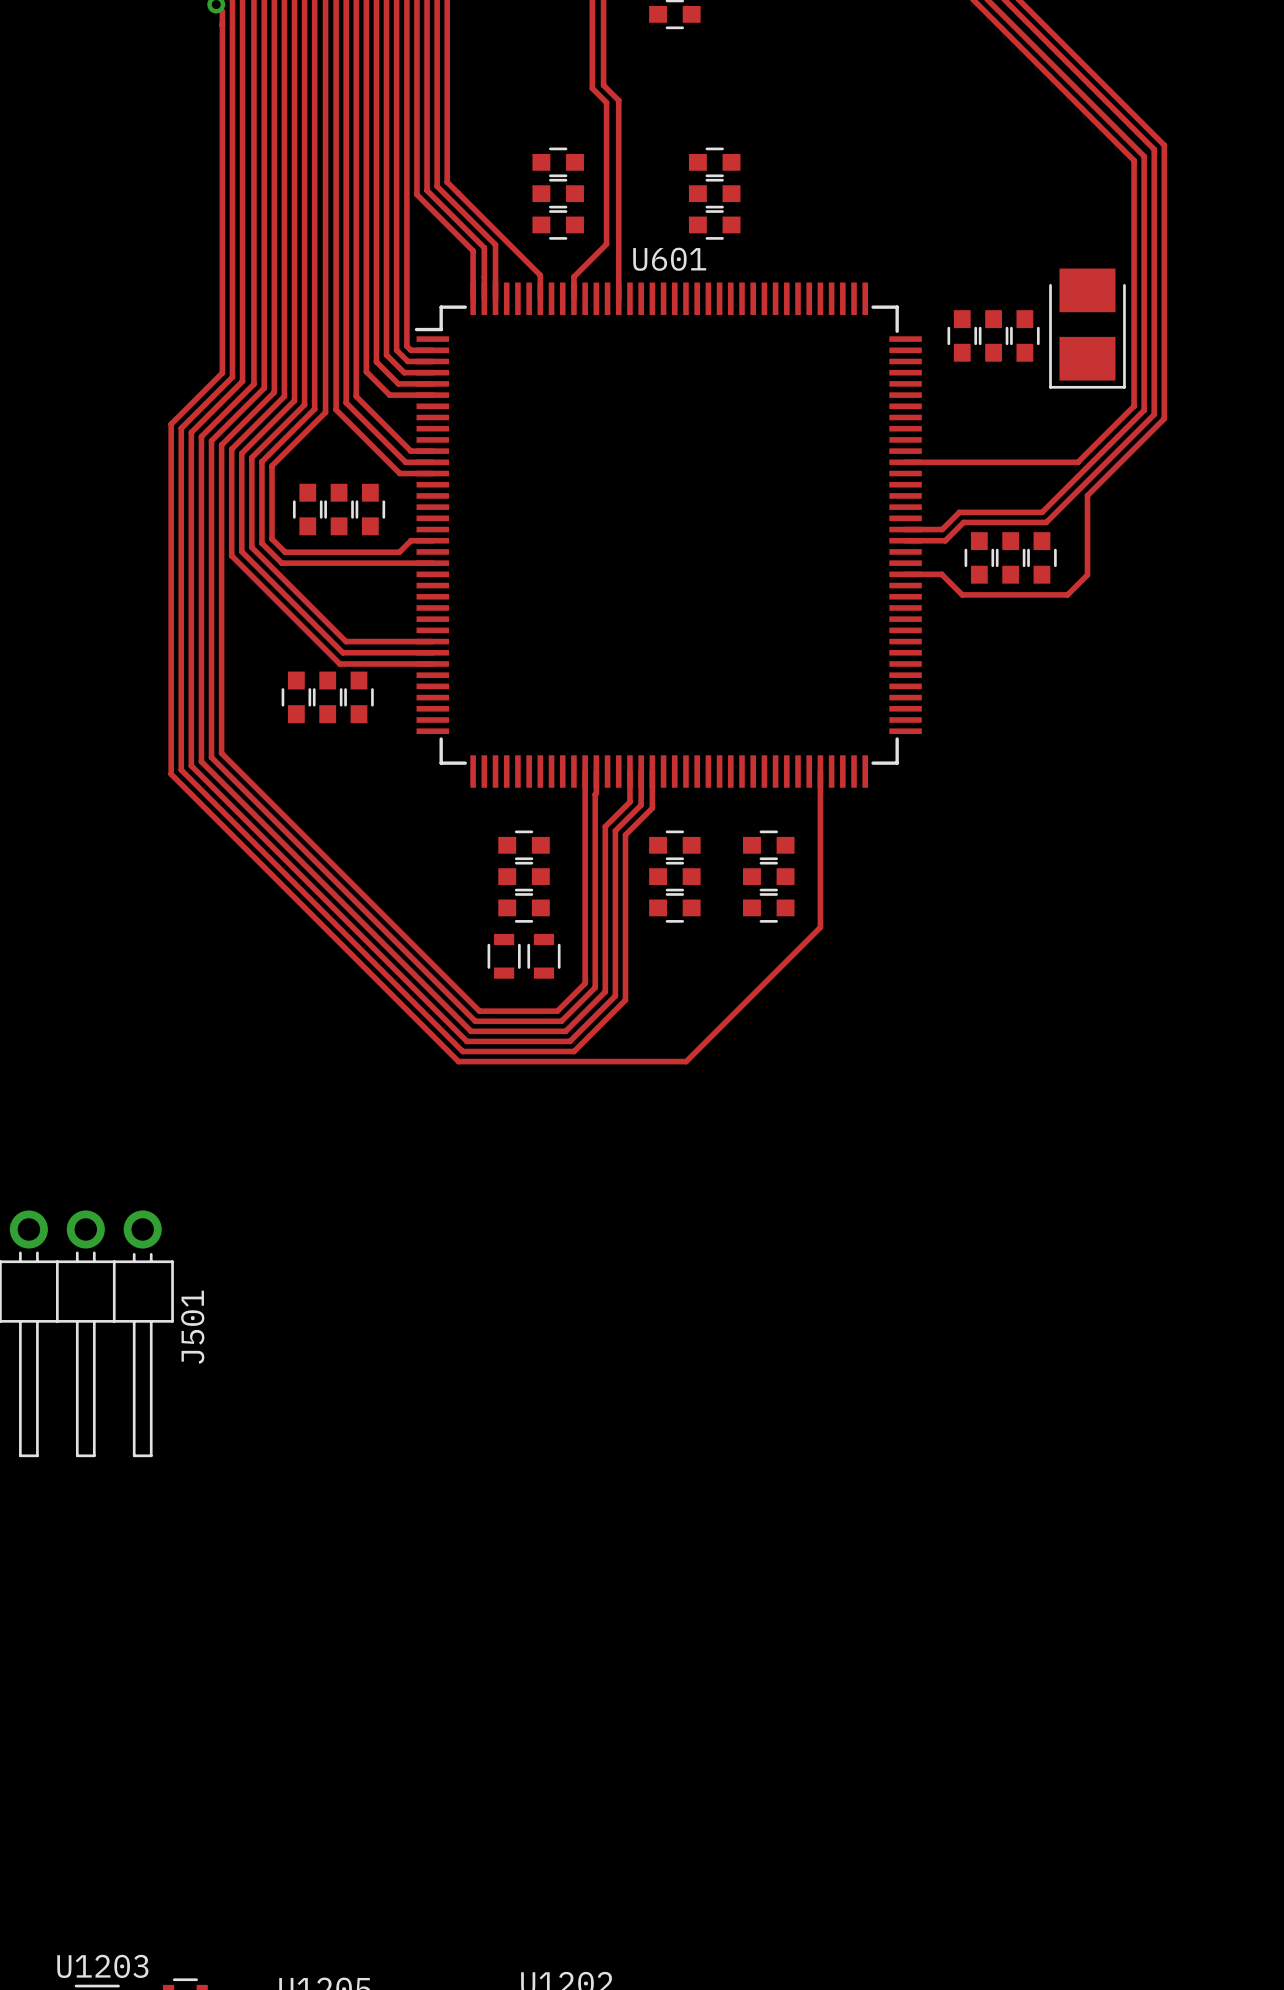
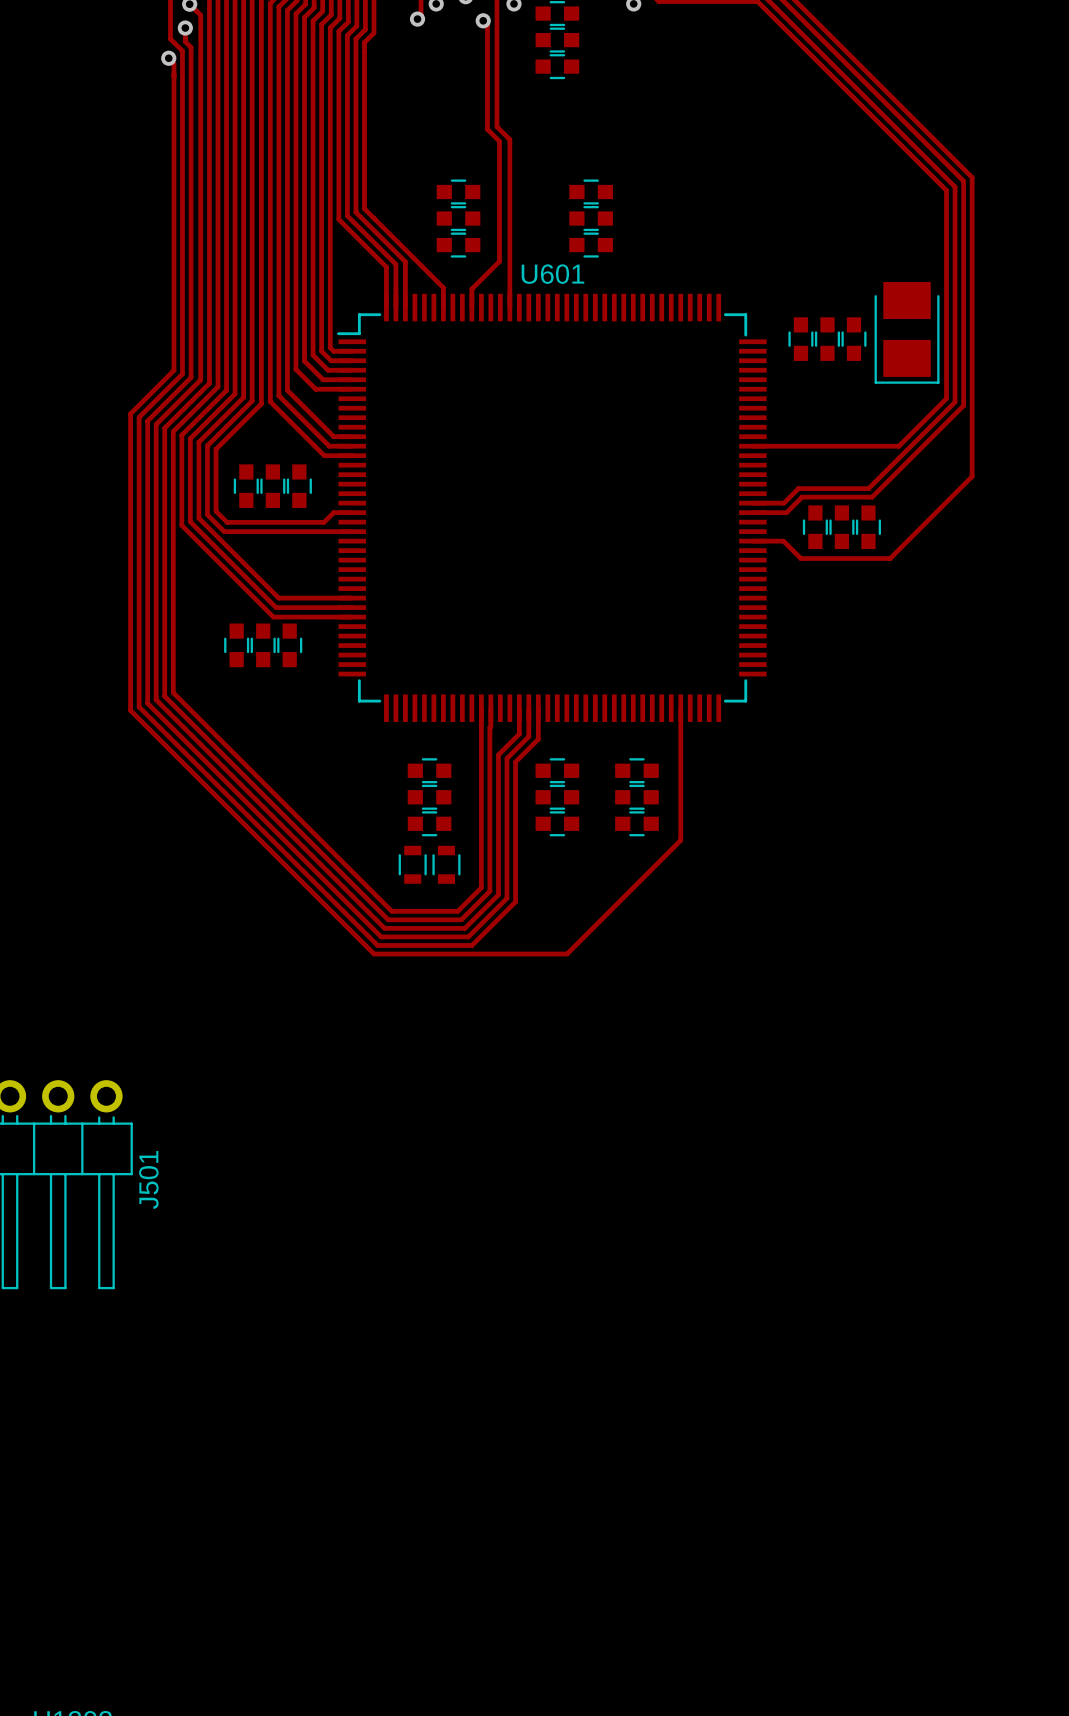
track: (1164, 418) (1087, 495) (1087, 574) -> (972, 409) (972, 476) (907, 541)

